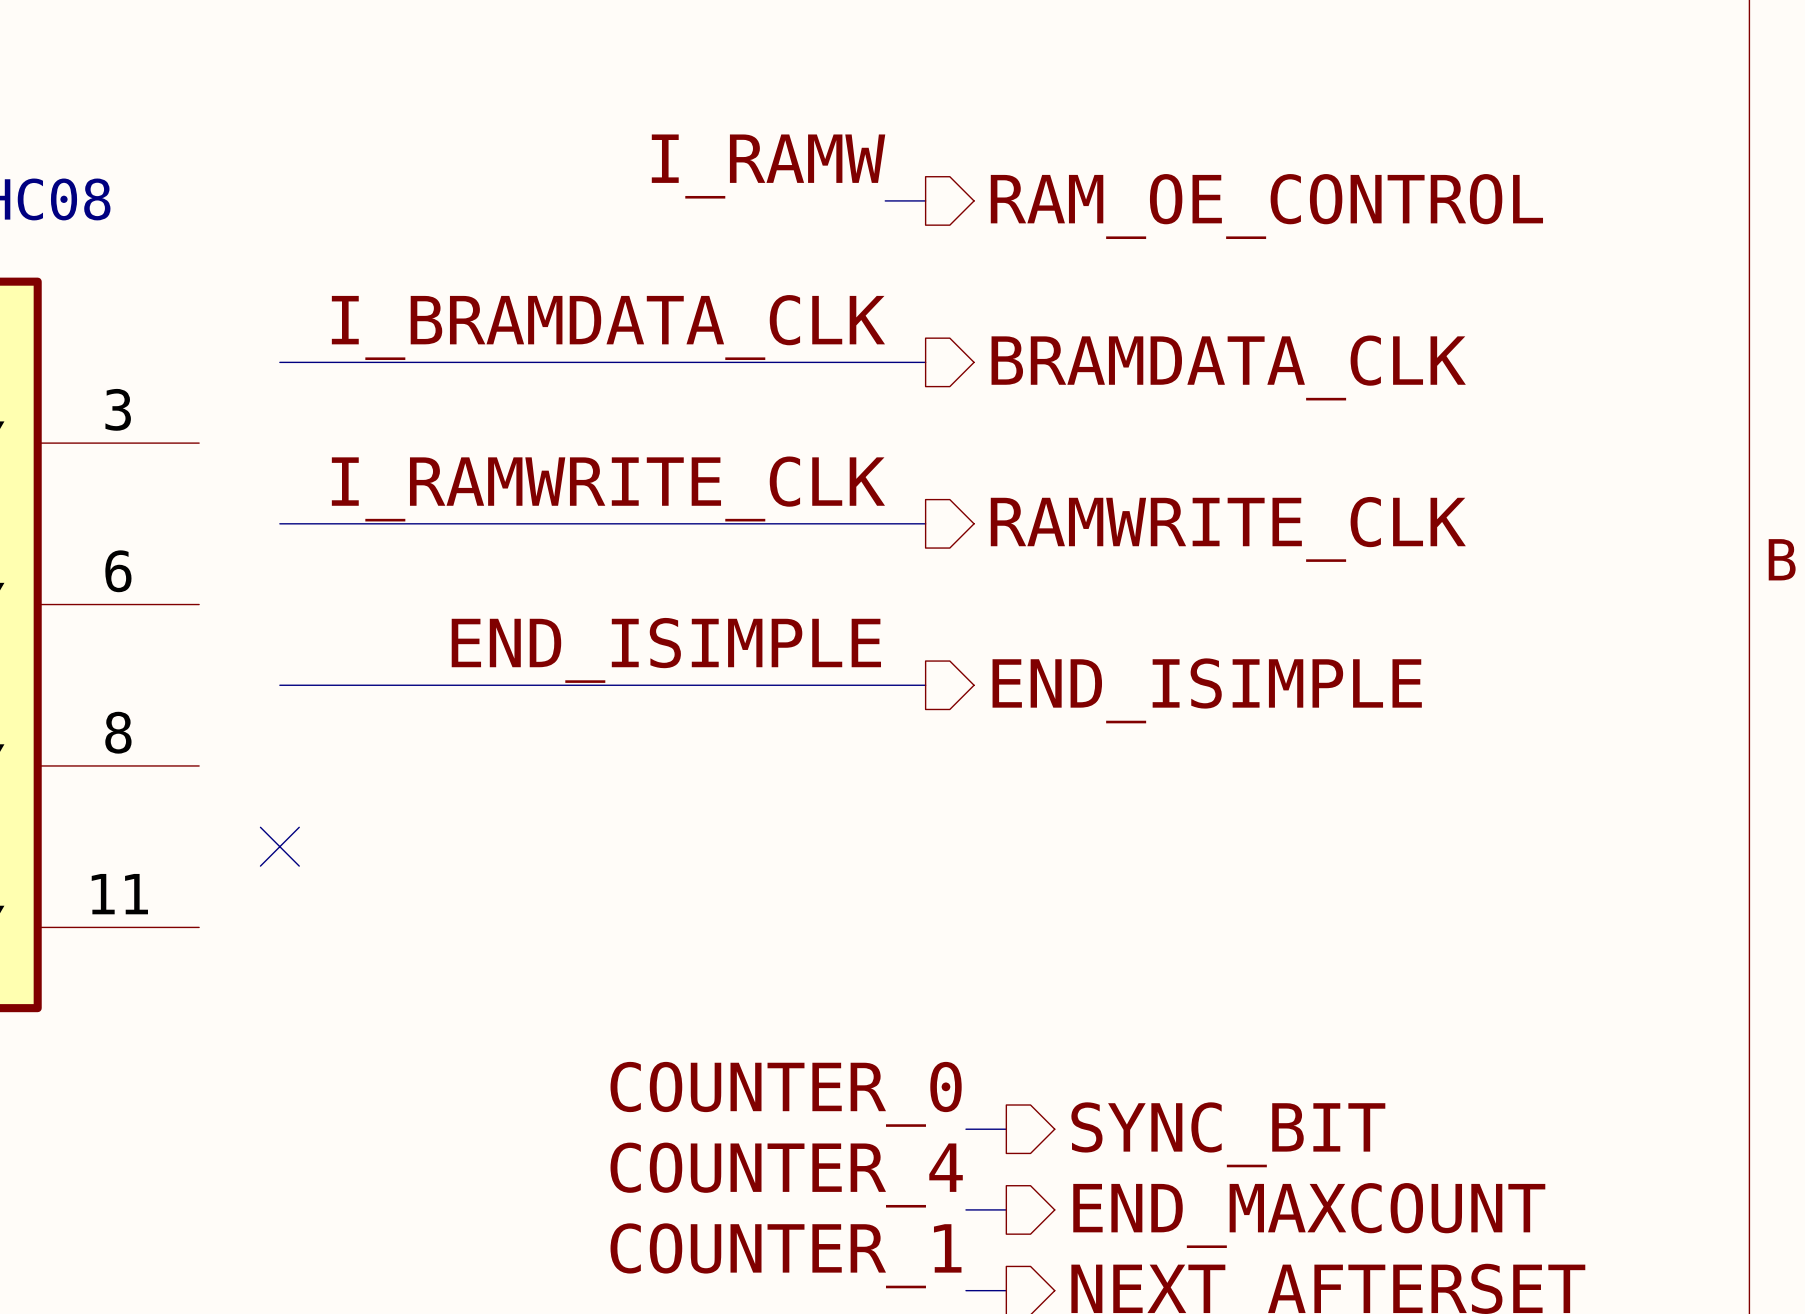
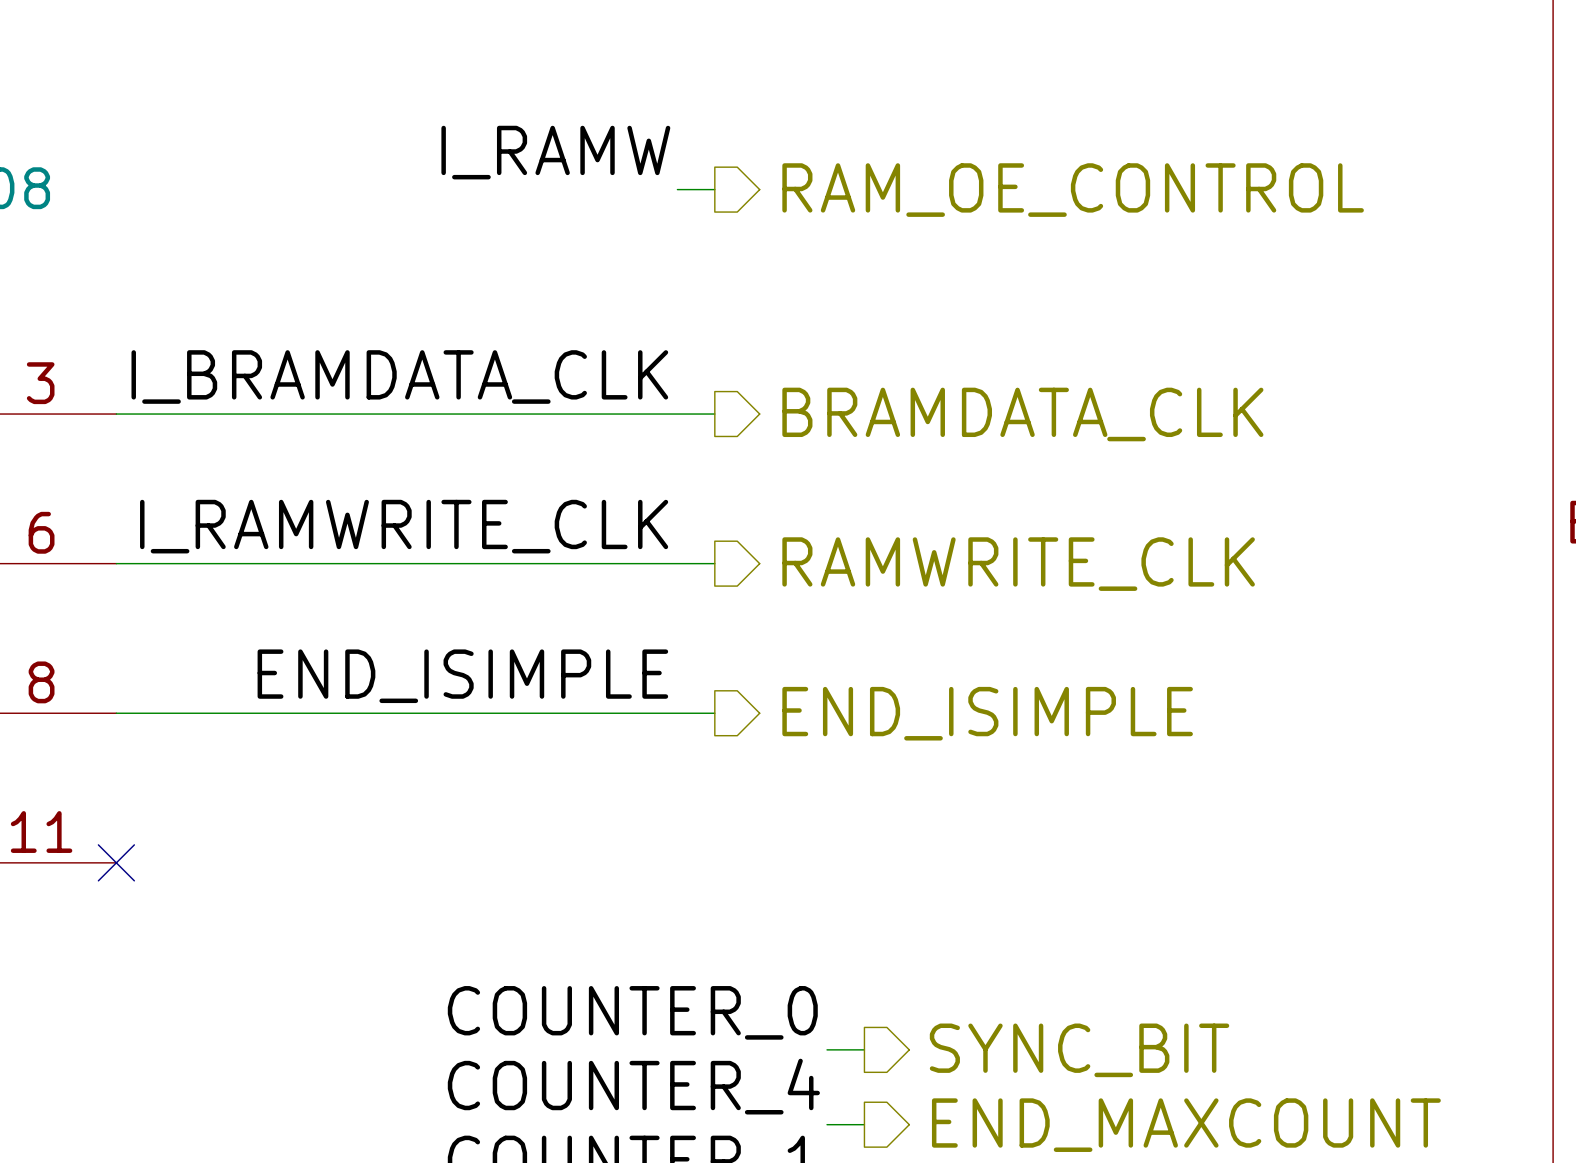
label position: I_RAMW (768, 166) -> I_RAMW (555, 152)
wire: (885, 200) (925, 200) -> (677, 189) (714, 189)
hierarchical label position: RAM_OE_CONTROL (1266, 206) -> RAM_OE_CONTROL (1073, 190)
label position: I_BRAMDATA_CLK (608, 327) -> I_BRAMDATA_CLK (399, 377)
wire: (279, 362) (925, 362) -> (116, 414) (714, 414)
hierarchical label position: BRAMDATA_CLK (1228, 367) -> BRAMDATA_CLK (1022, 414)
label position: I_RAMWRITE_CLK (608, 488) -> I_RAMWRITE_CLK (404, 526)
wire: (279, 523) (925, 523) -> (116, 563) (714, 563)
hierarchical label position: RAMWRITE_CLK (1228, 529) -> RAMWRITE_CLK (1018, 564)
label position: END_ISIMPLE (666, 650) -> END_ISIMPLE (462, 676)
wire: (279, 685) (925, 685) -> (116, 713) (714, 713)
hierarchical label position: END_ISIMPLE (1207, 690) -> END_ISIMPLE (987, 713)
no-connect mark position: (279, 846) -> (116, 862)

